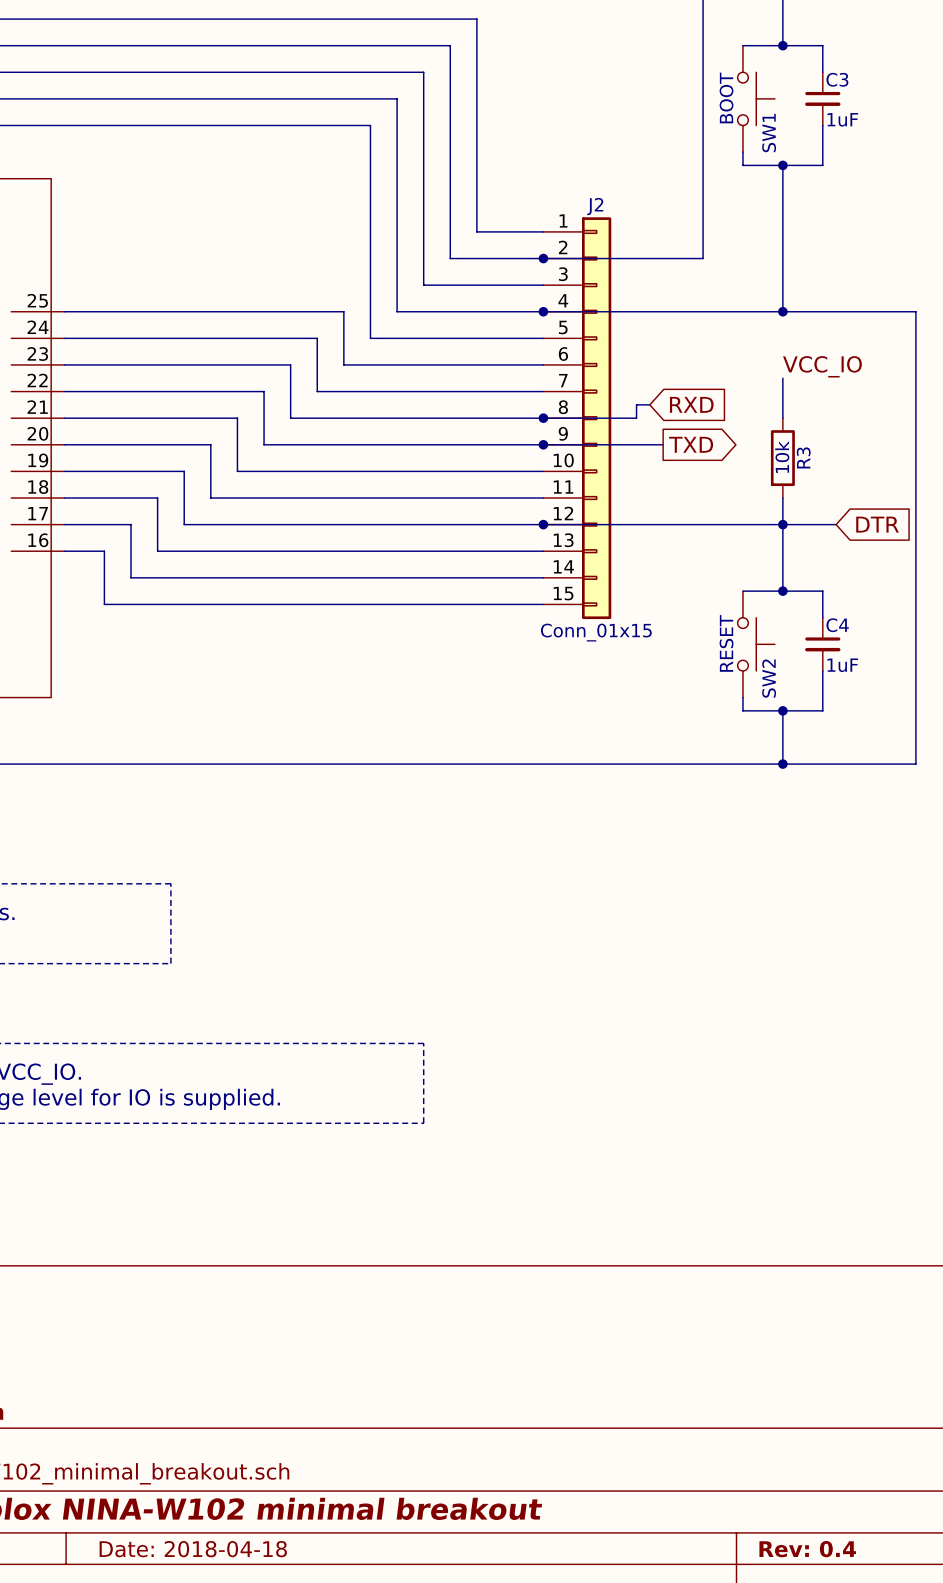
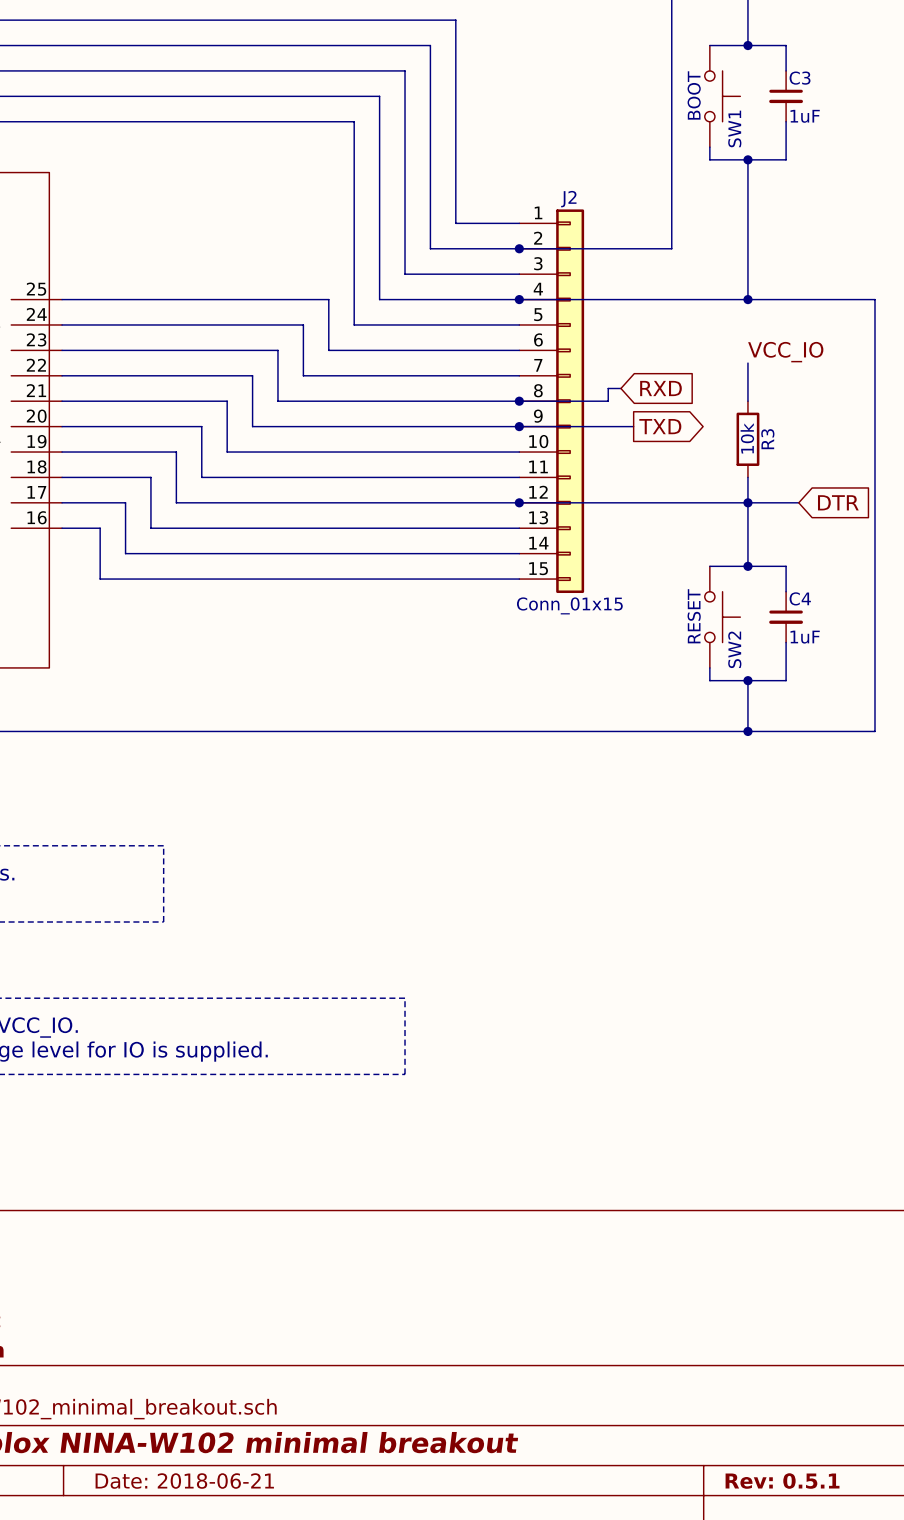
title block: Date: 2018-04-18 (193, 1549) -> Date: 2018-06-21 (184, 1481)
title block: Rev: 0.4 (807, 1549) -> Rev: 0.5.1 (782, 1481)

